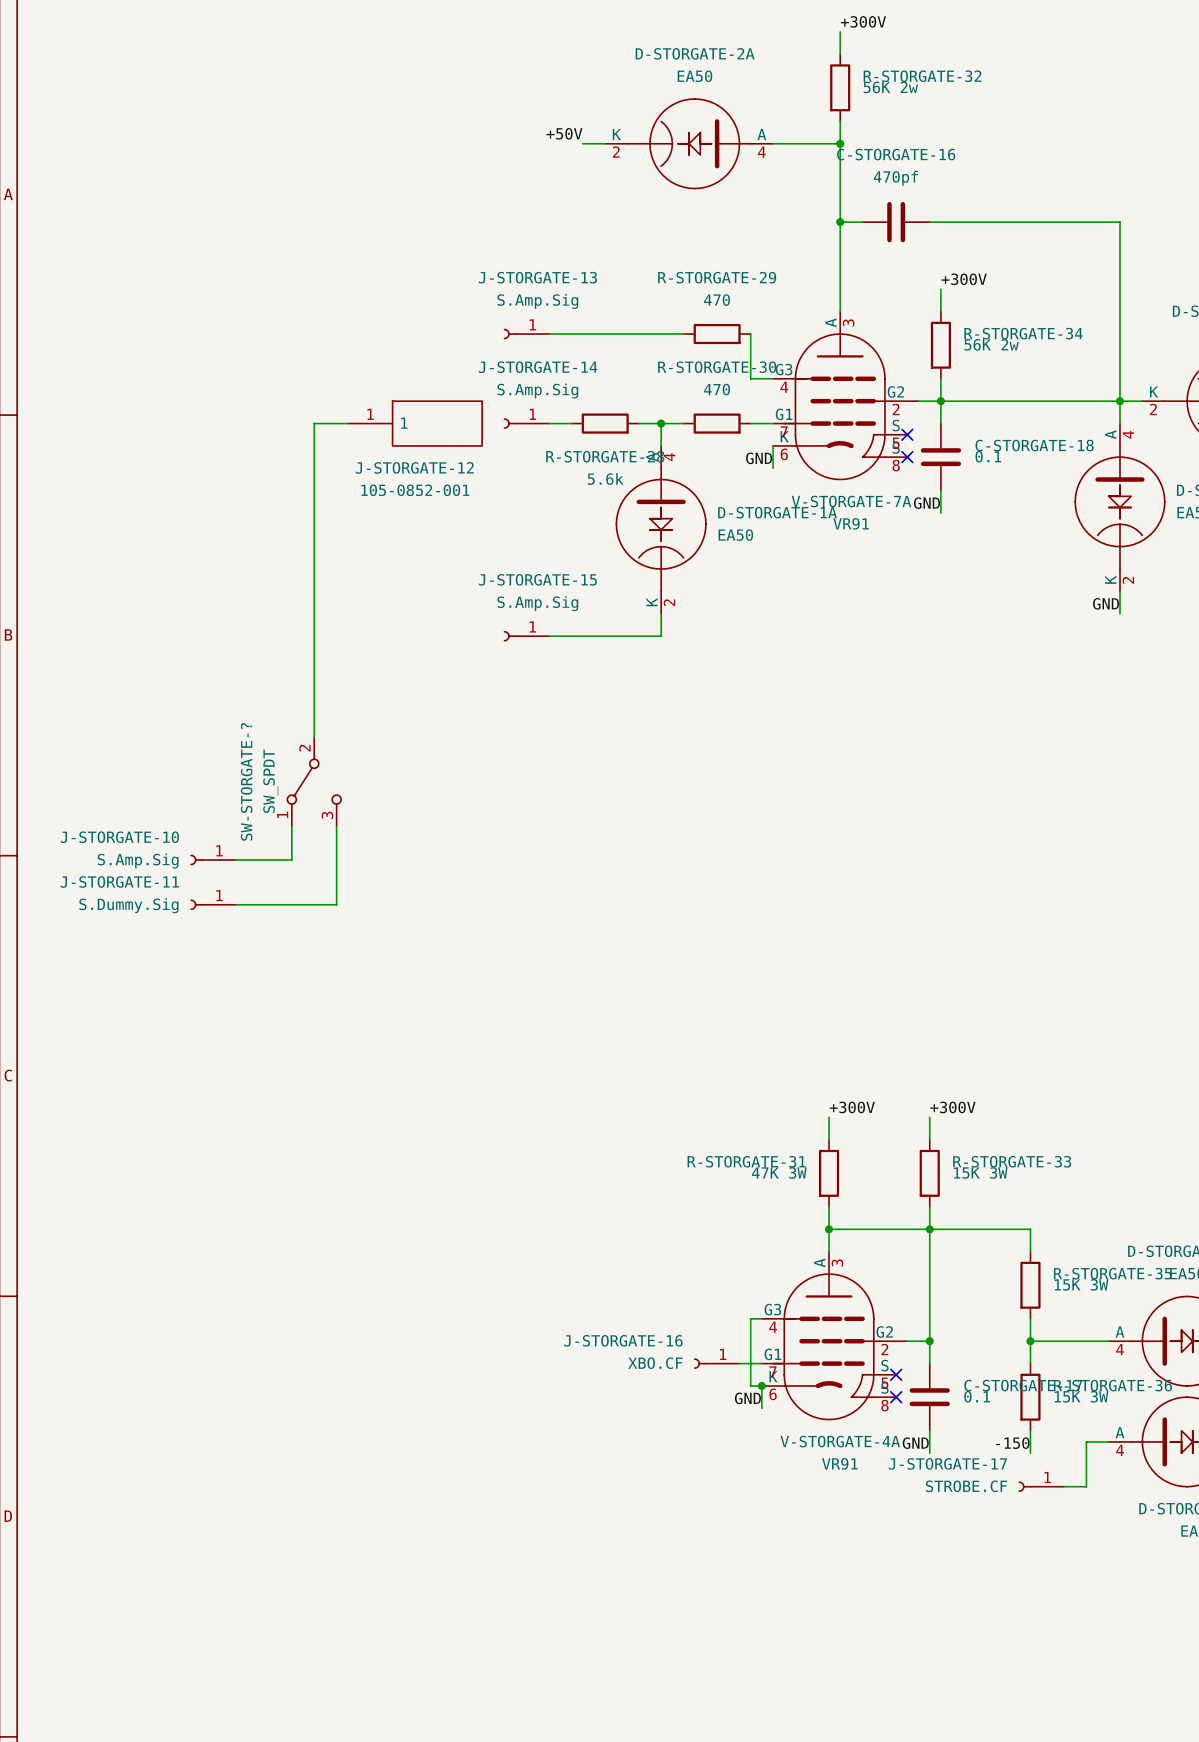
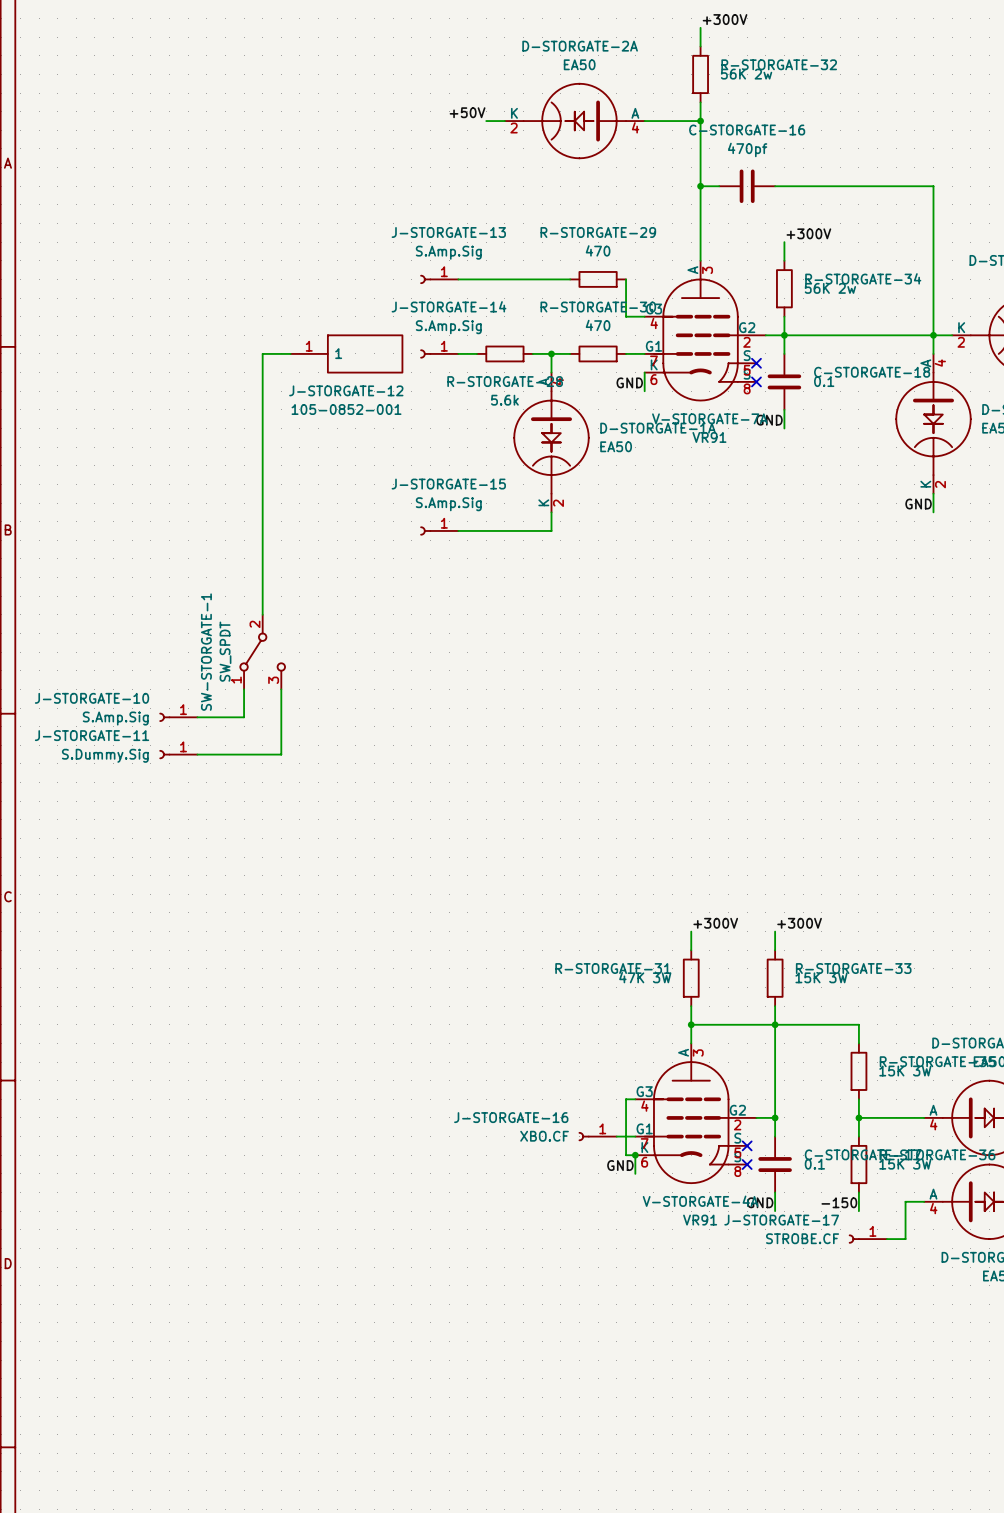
SW-STORGATE-? name: SW-STORGATE-? (246, 781) -> SW-STORGATE-1 (206, 652)

